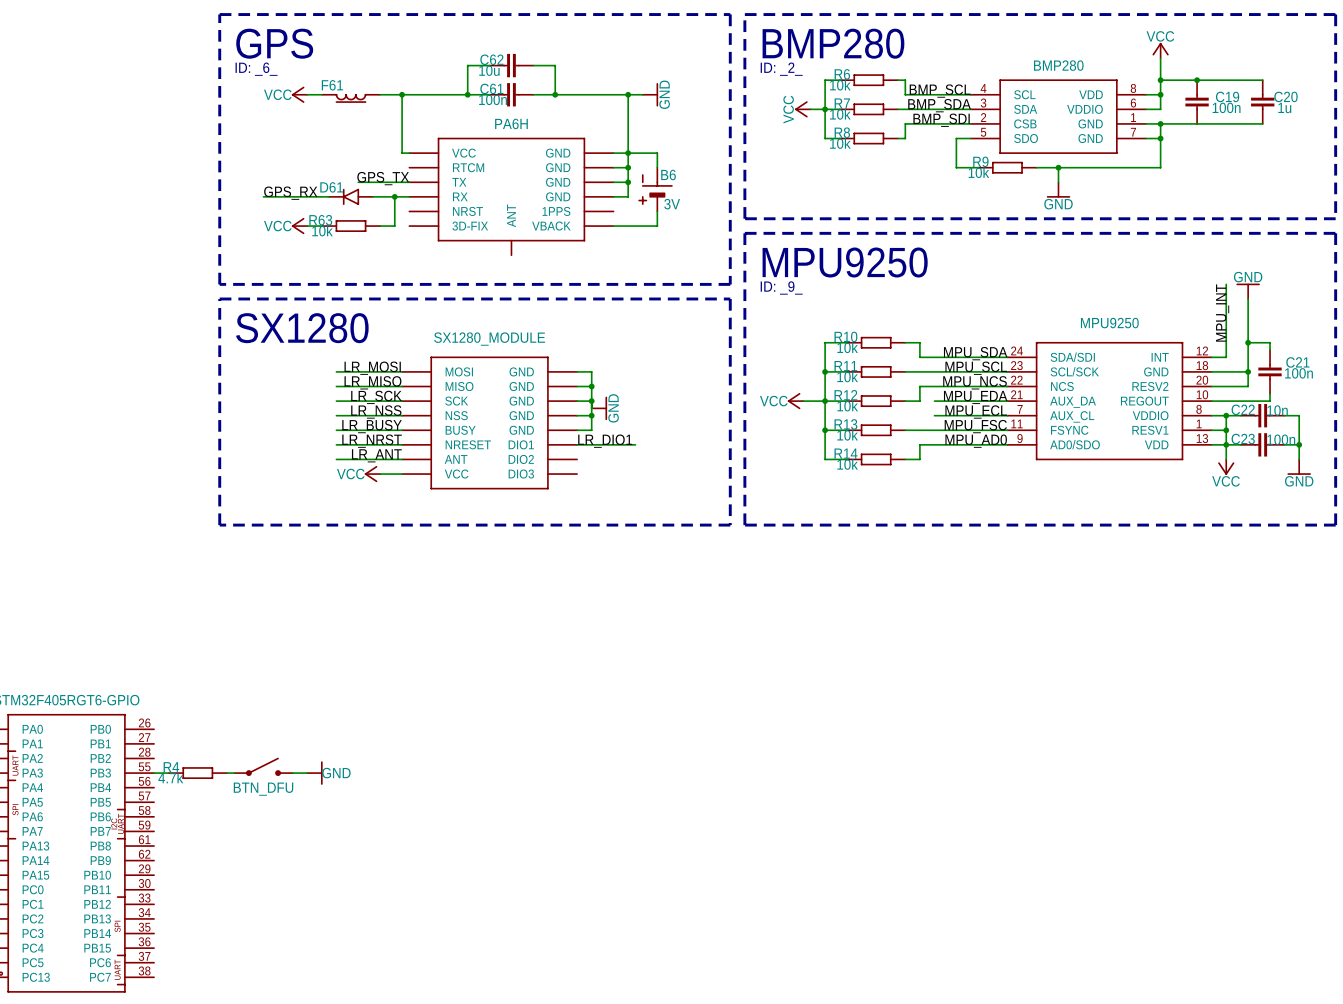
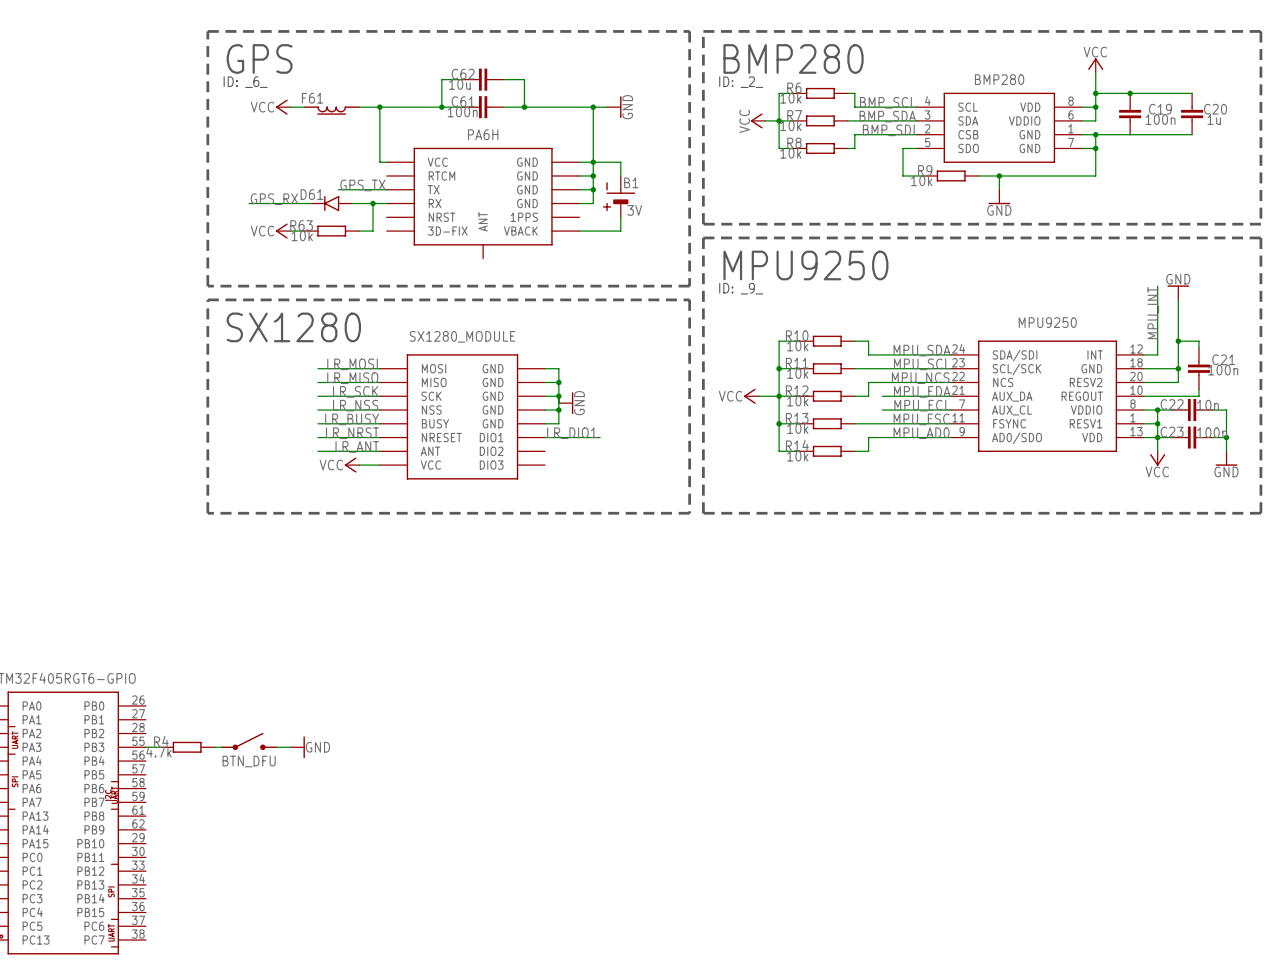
B6 name: B6 (668, 174) -> B1 (631, 182)

